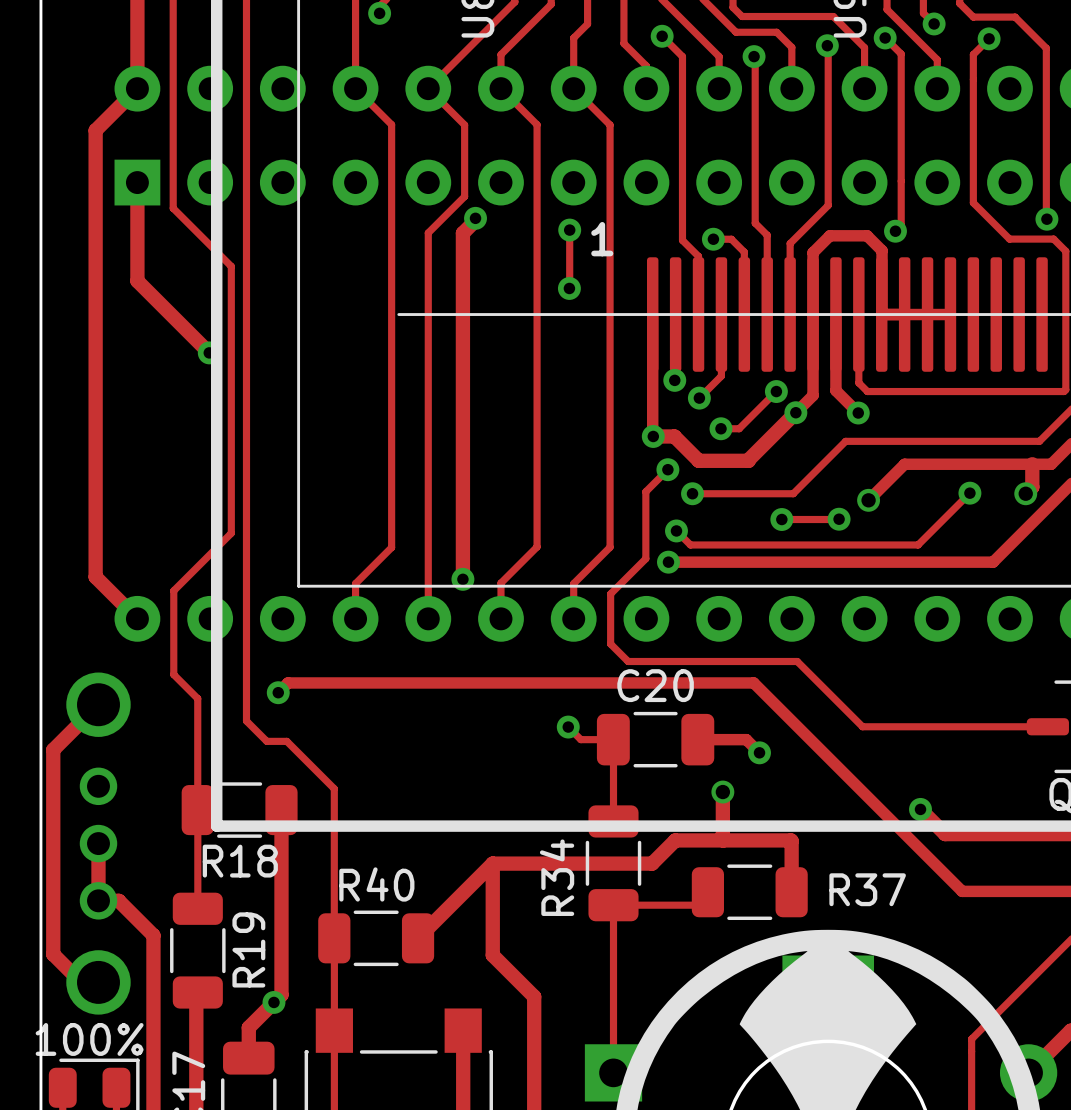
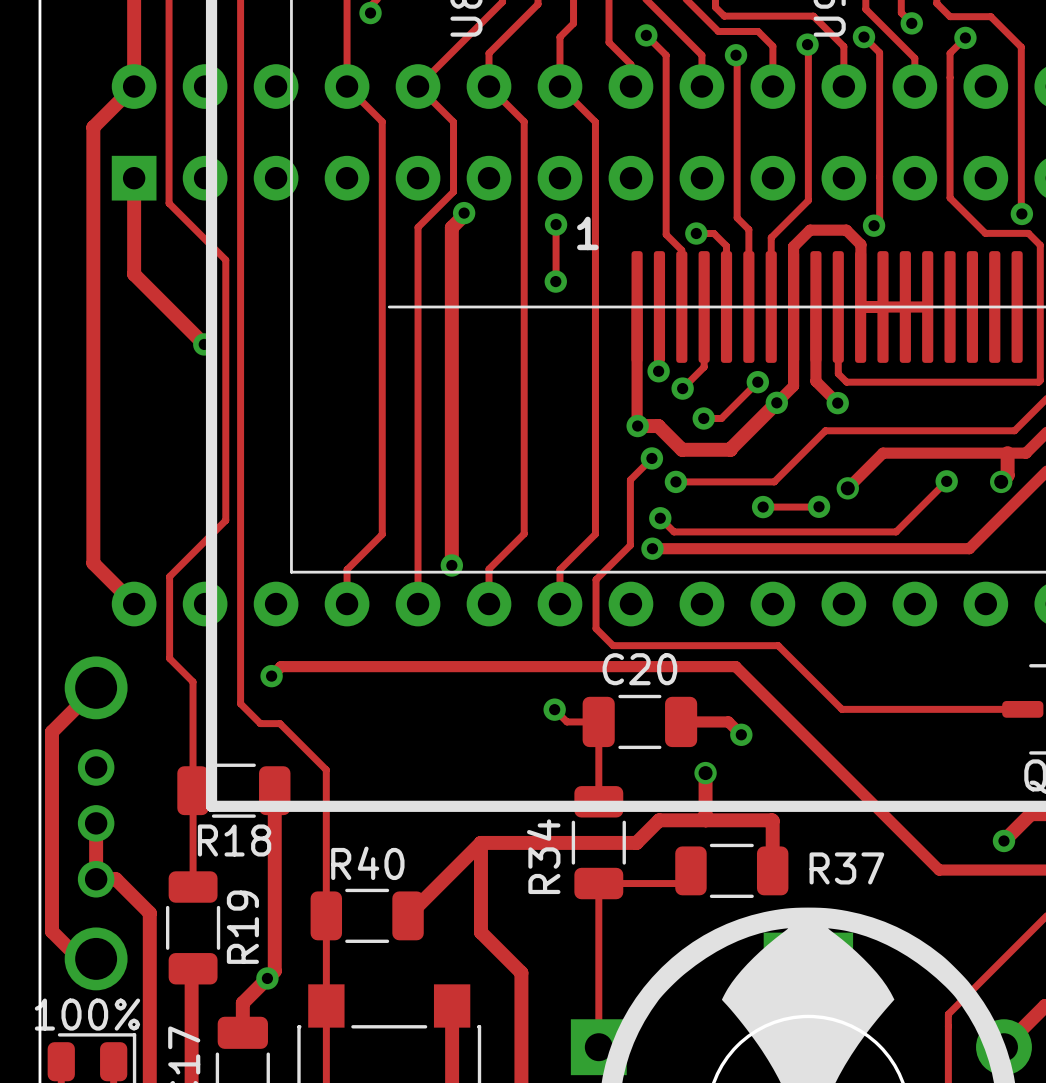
track: (920, 809) (945, 834) (1056, 834) -> (1003, 840) (1030, 814)
via: (920, 809) -> none
via: none -> (1003, 840)

